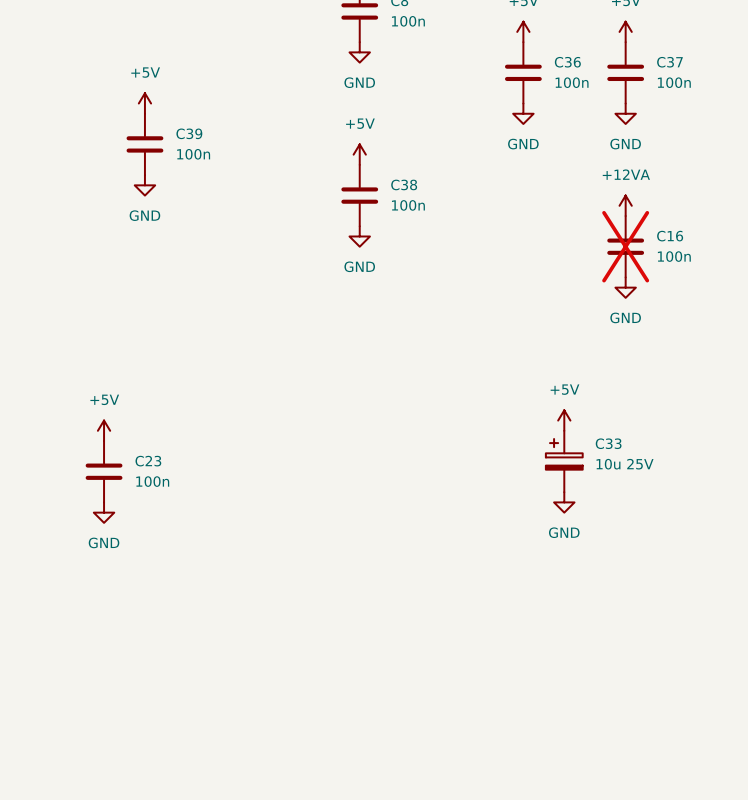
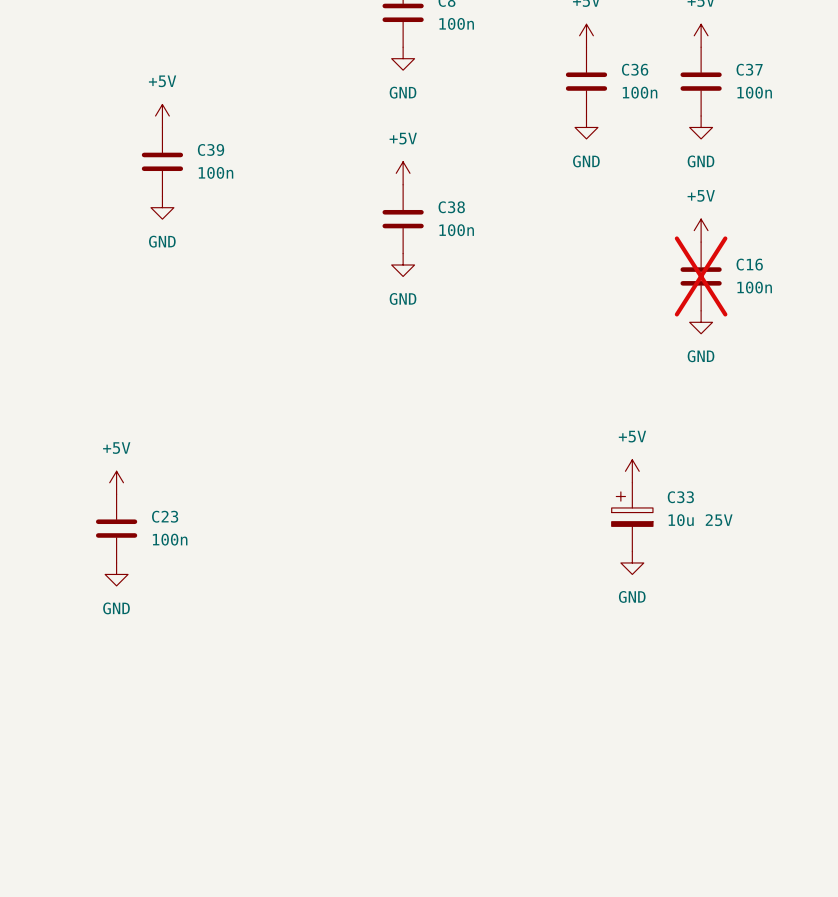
power symbol: +12VA (625, 205) -> +5V (701, 230)

